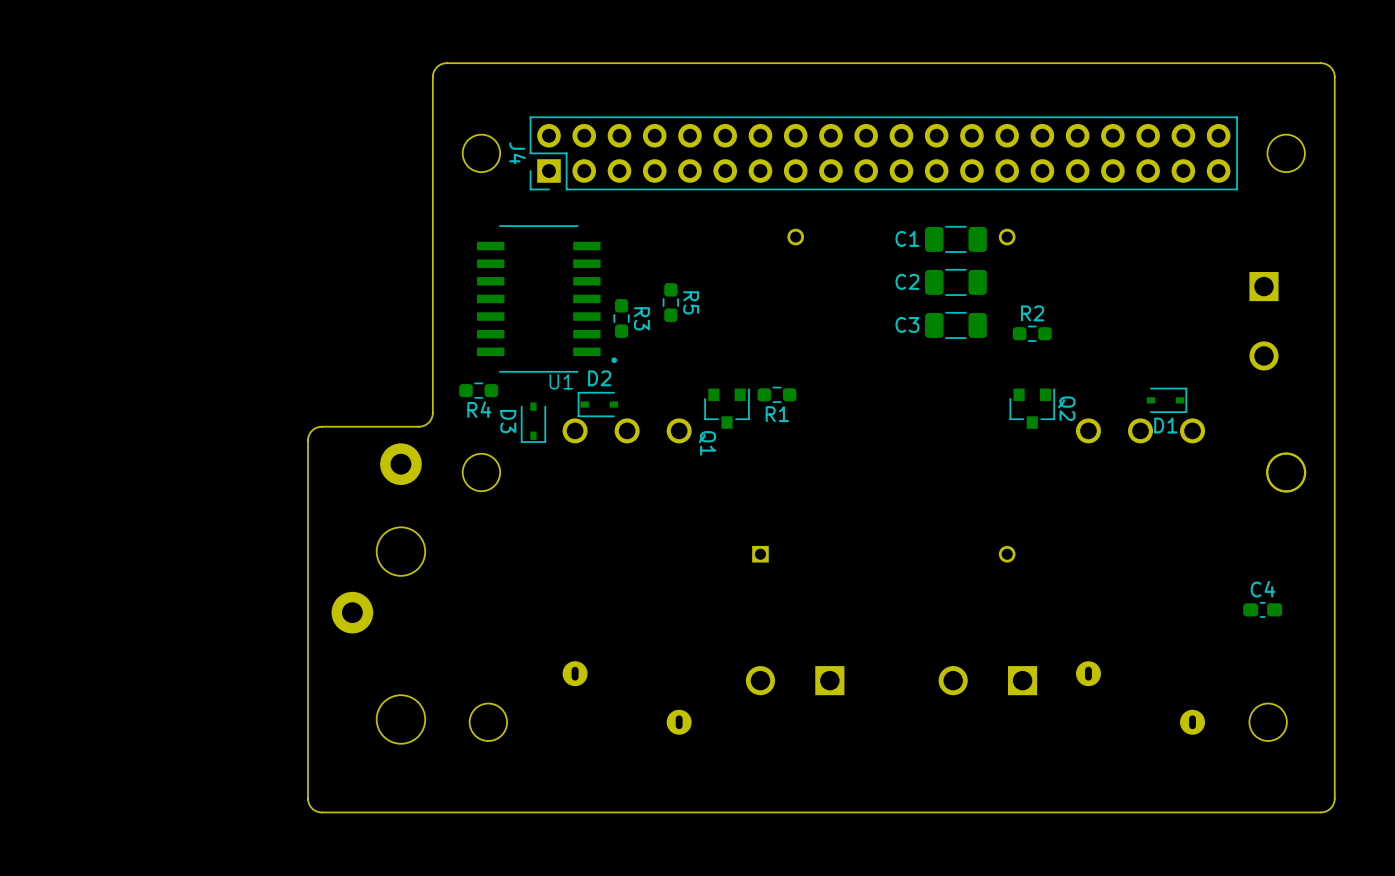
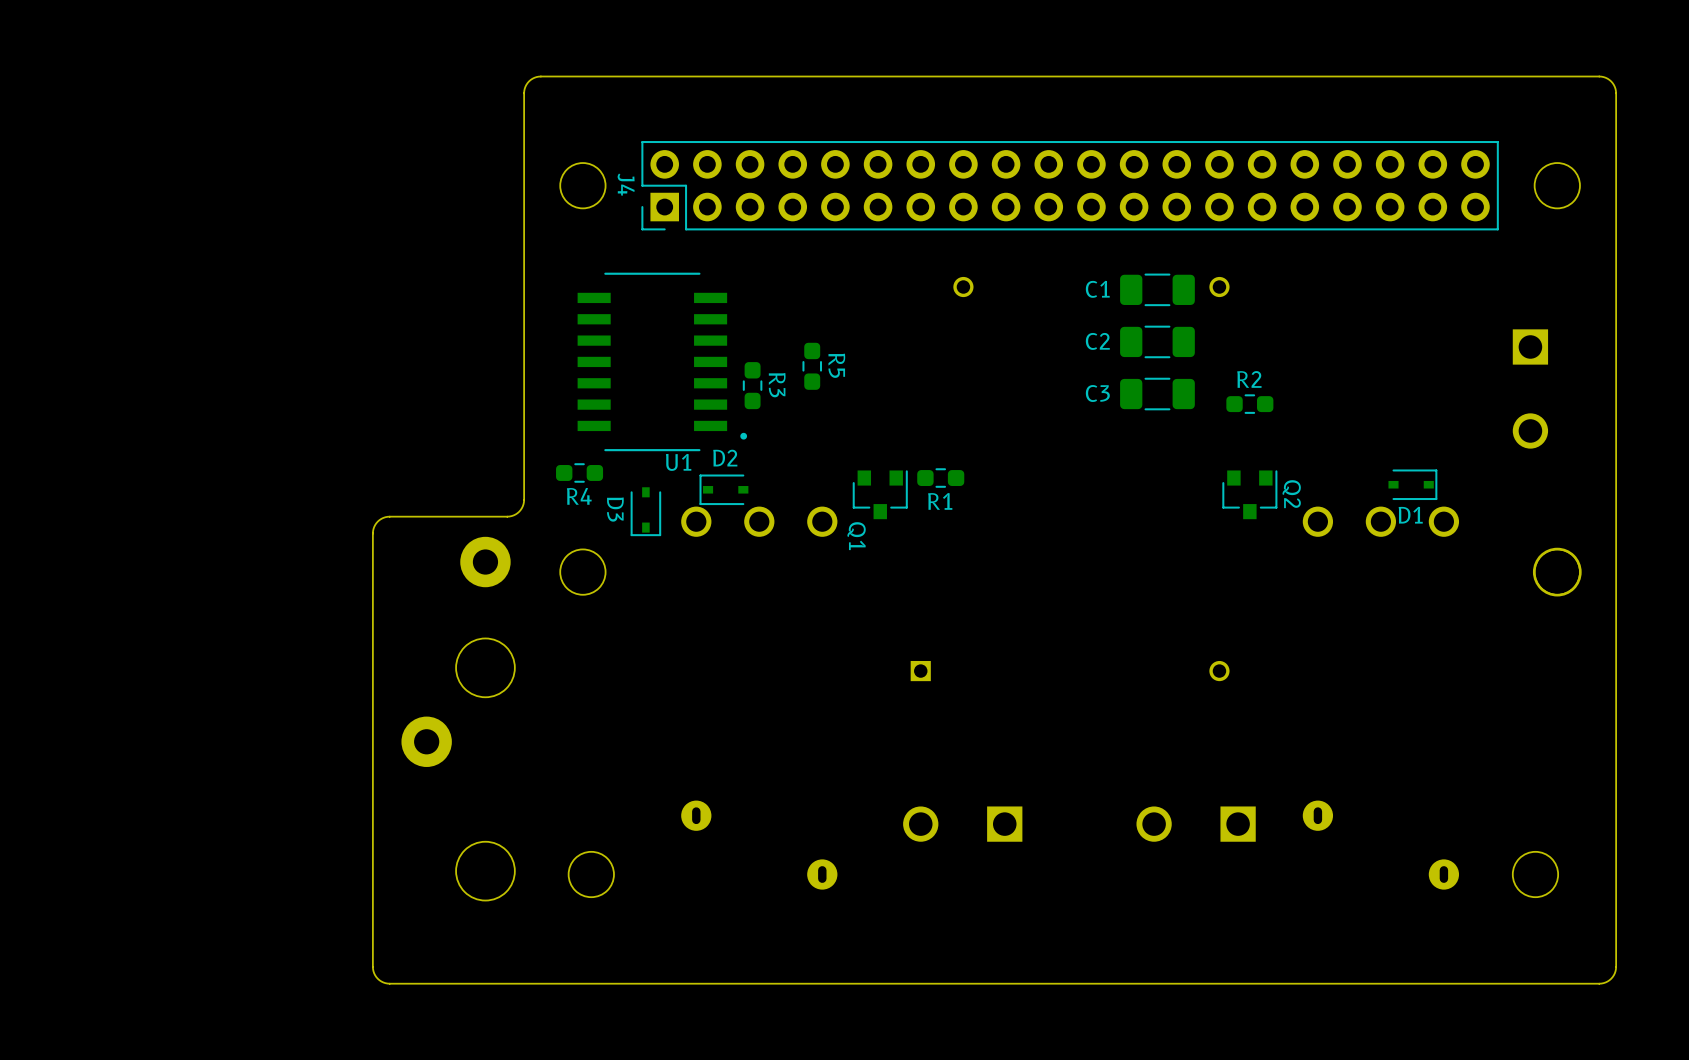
C4: (1262, 609) -> none

